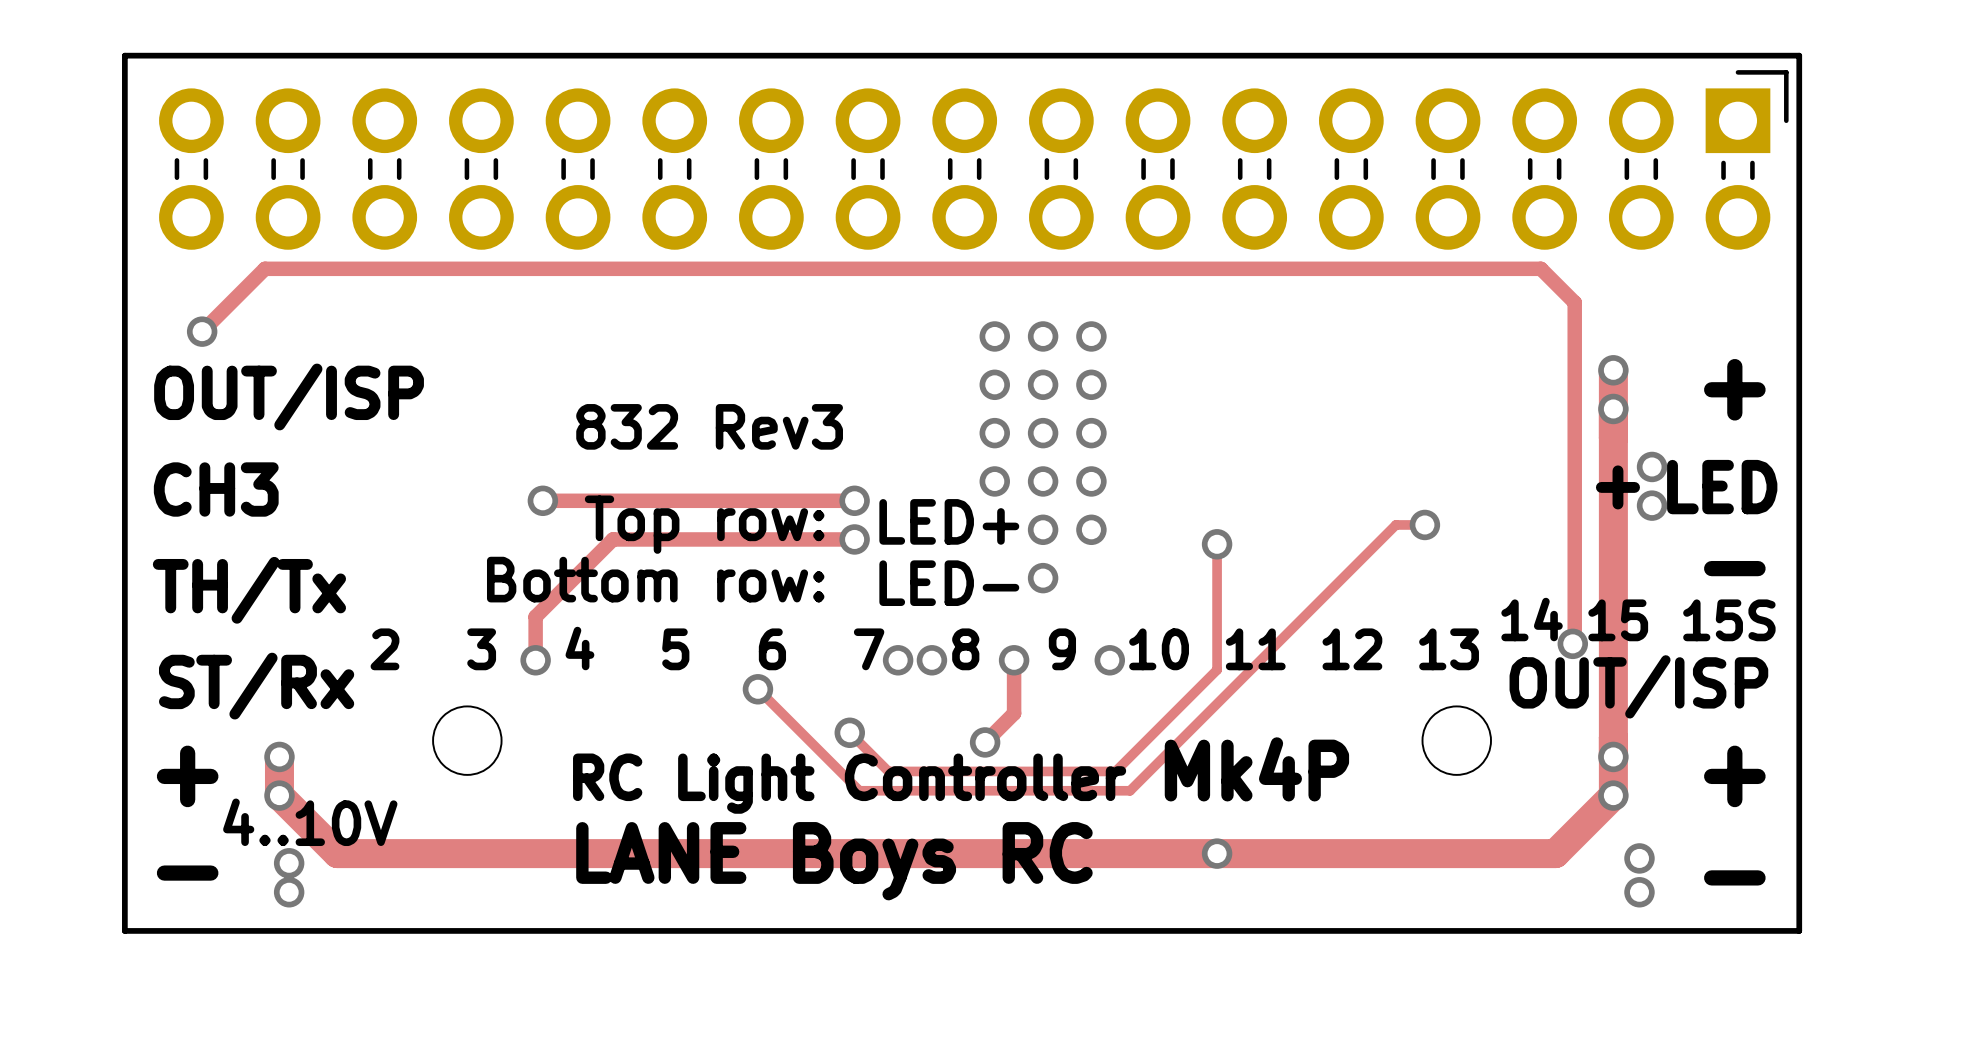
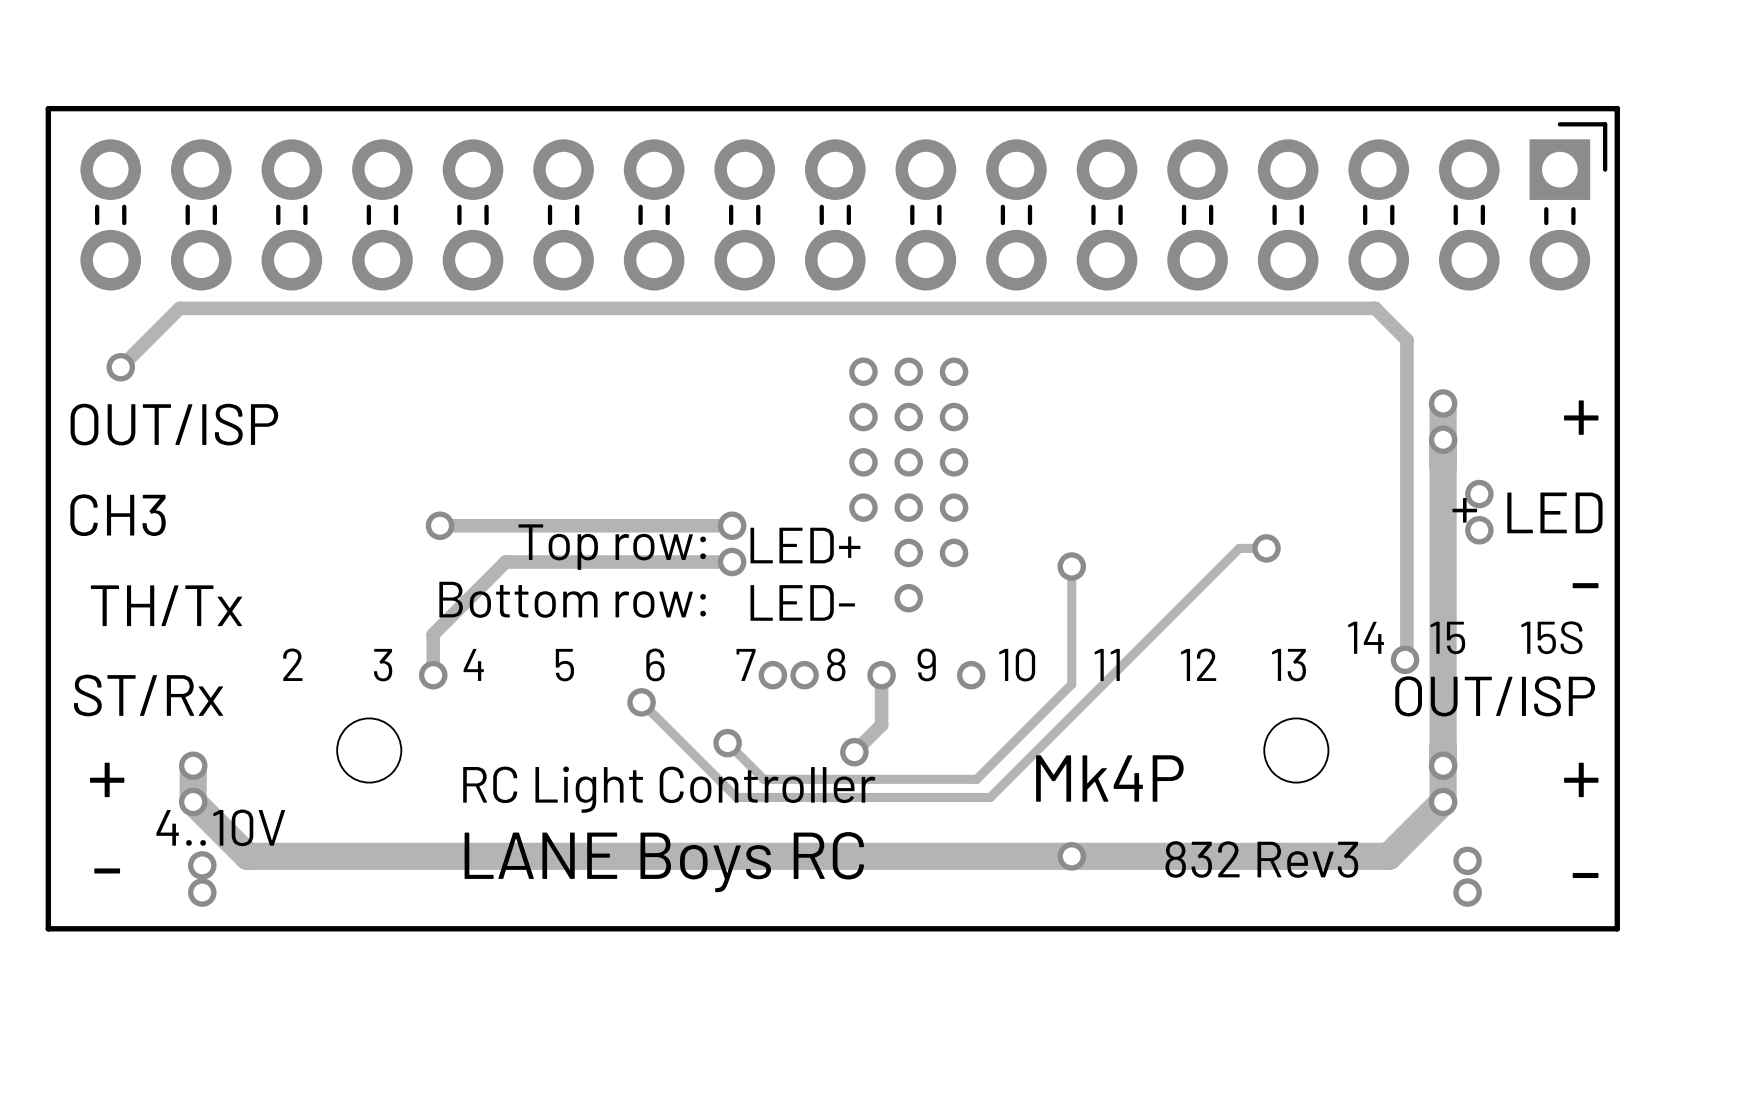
text position: 832 Rev3 (709, 426) -> 832 Rev3 (1261, 859)

